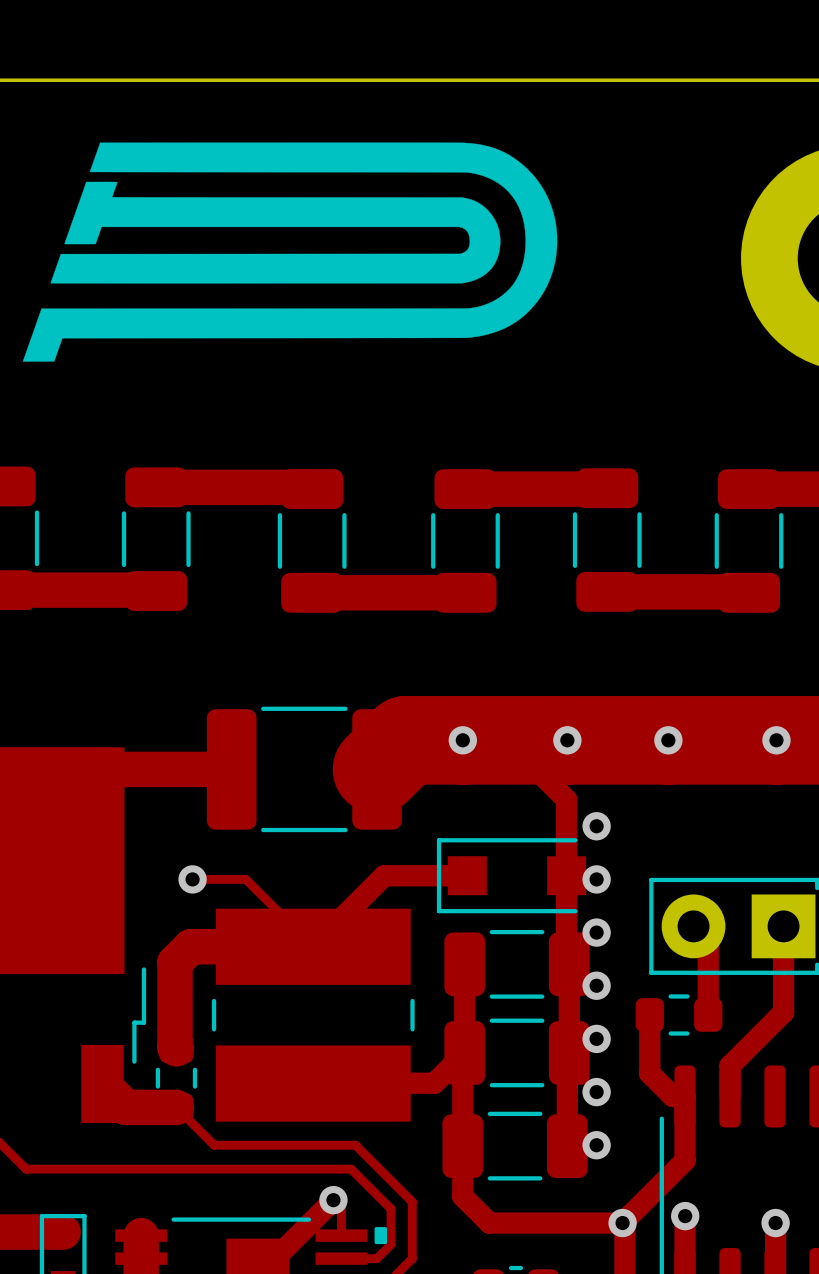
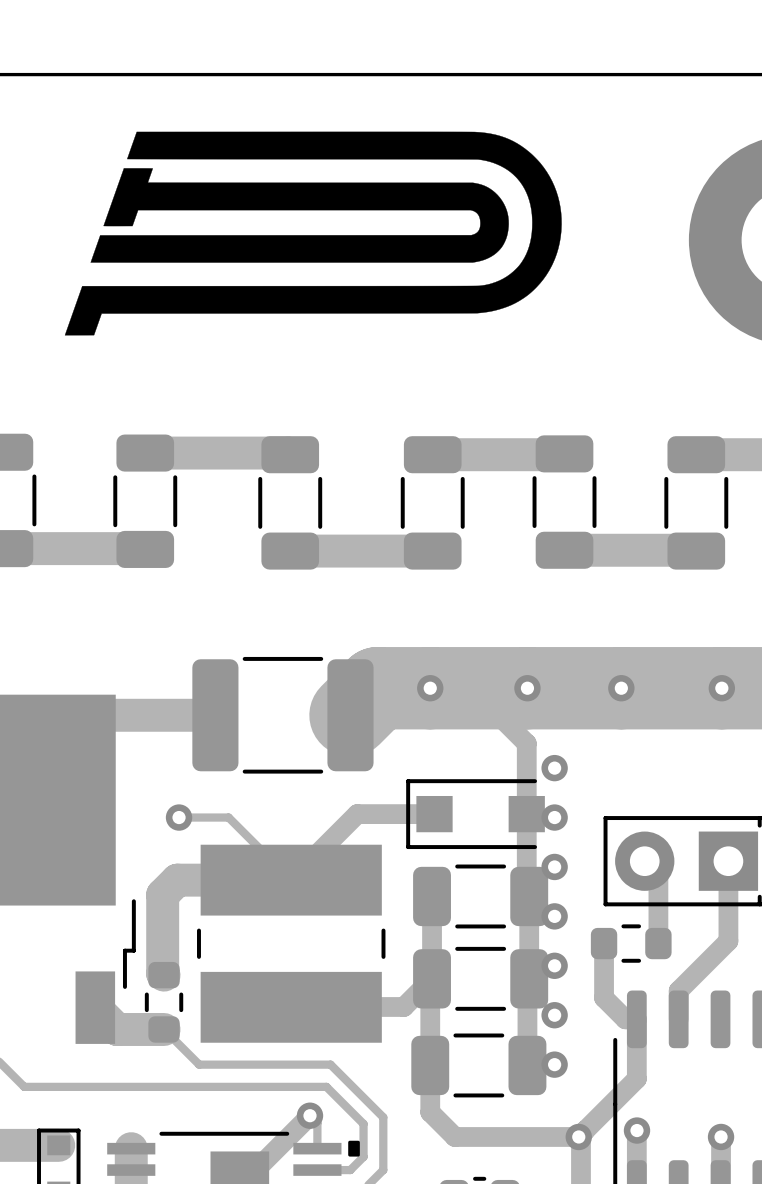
drawing position: (290, 252) -> (313, 233)

